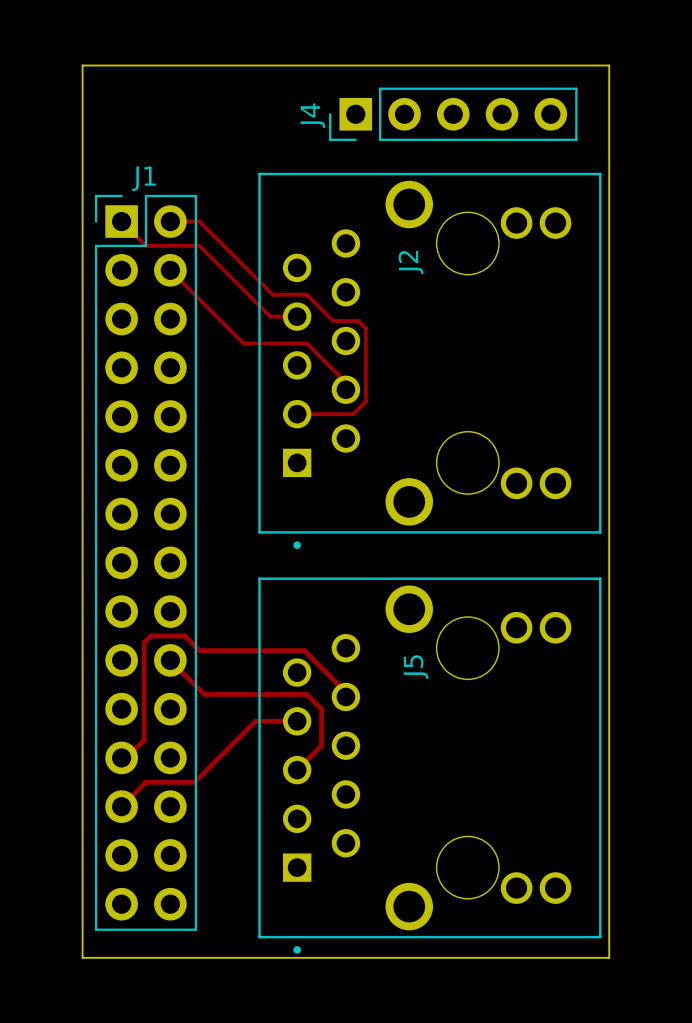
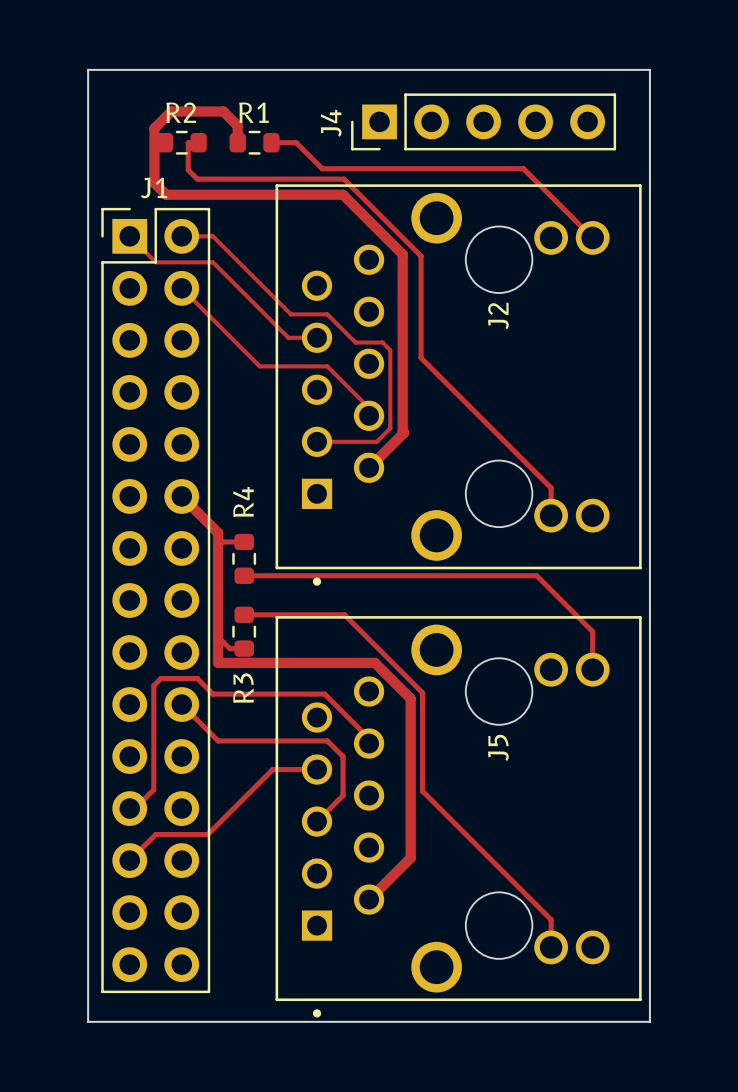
R2: none -> (181, 142)
track: none -> (192, 142) (188, 142) (188, 170) (197, 179) (344, 179) (421, 256) (421, 357) (551, 487) (551, 515)
track: none -> (237, 142) (237, 125) (223, 111) (171, 111) (154, 128) (154, 183) (166, 194) (343, 194) (402, 254) (404, 432) (369, 467)
R1: none -> (254, 142)
track: none -> (271, 142) (296, 142) (322, 168) (523, 168) (592, 237)
J2 name position: J2 (411, 262) -> J2 (498, 316)
track: none -> (181, 496) (218, 532) (218, 662) (374, 662) (410, 698) (410, 857) (369, 899)
track: none -> (244, 541) (218, 543)
R4: none -> (244, 558)
track: none -> (244, 575) (536, 575) (592, 631) (592, 669)
track: none -> (244, 614) (344, 614) (422, 692) (422, 791) (551, 919) (551, 947)
R3: none -> (244, 631)
track: none -> (218, 642) (223, 642) (229, 648) (244, 648)
J5 name position: J5 (416, 667) -> J5 (498, 747)

